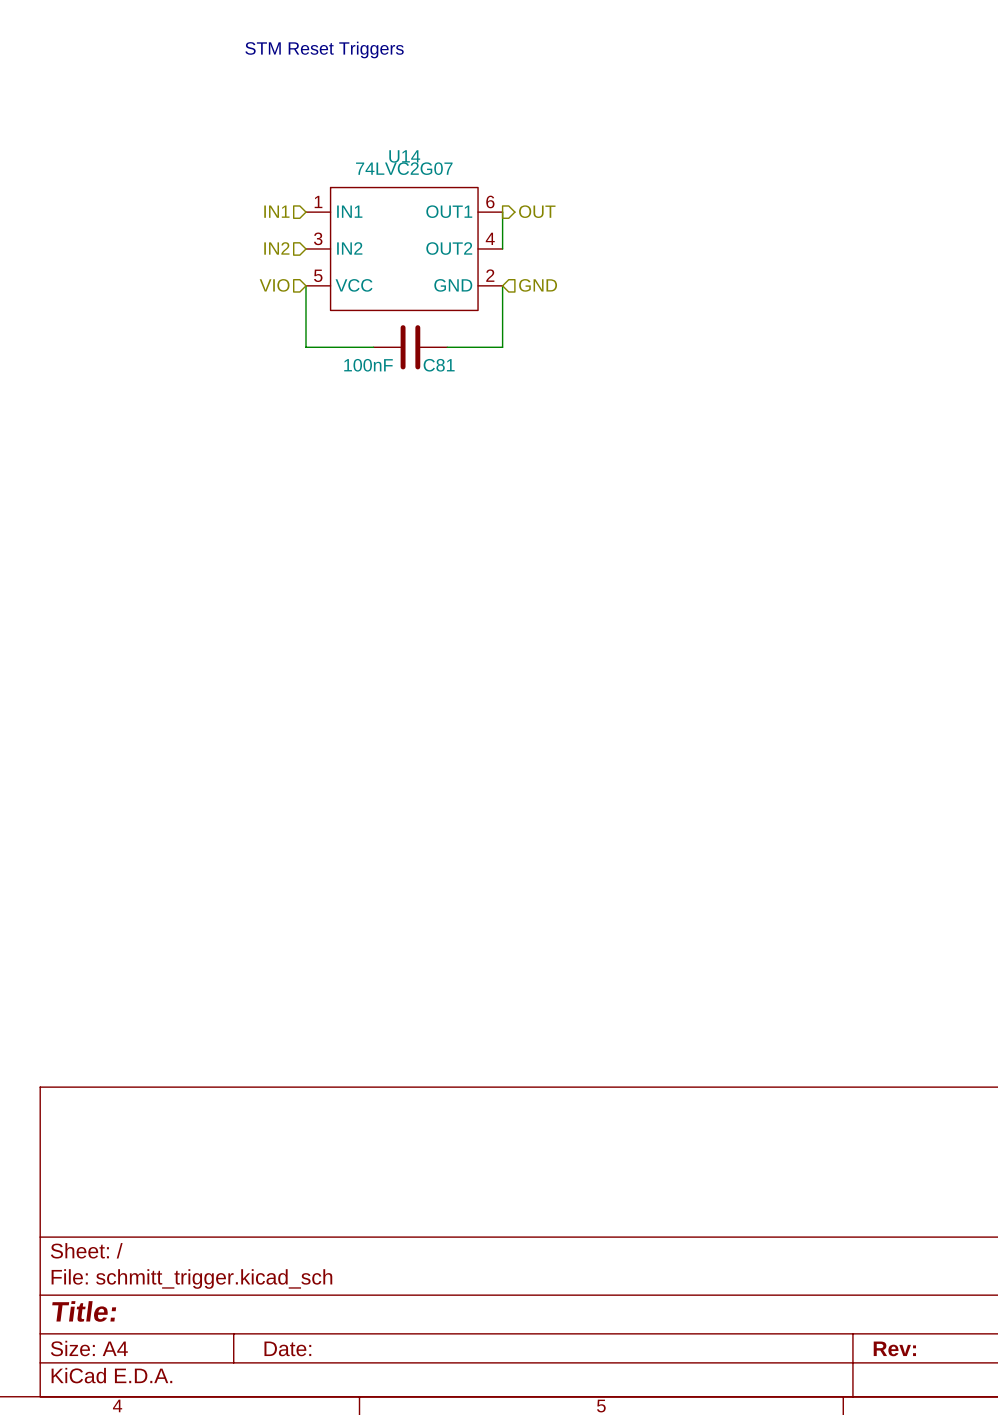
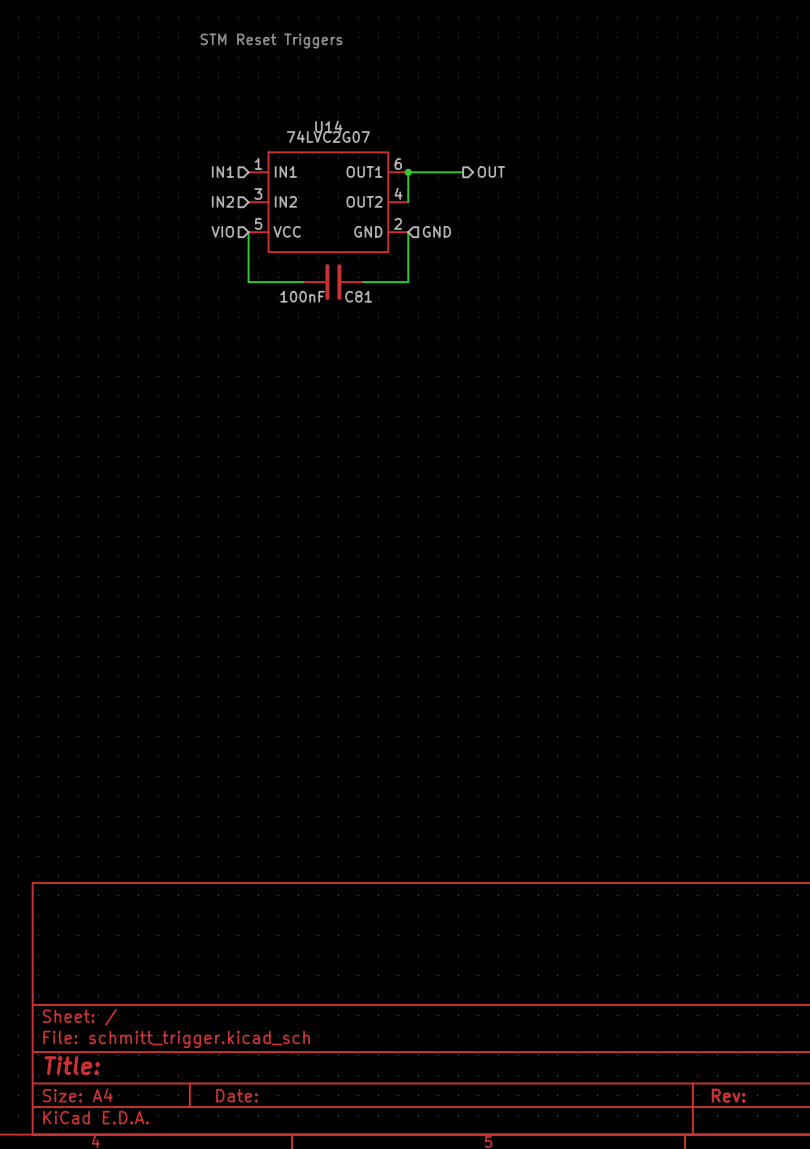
hierarchical label position: OUT (537, 211) -> OUT (491, 171)
wire: none -> (408, 172) (463, 172)
junction: none -> (408, 172)

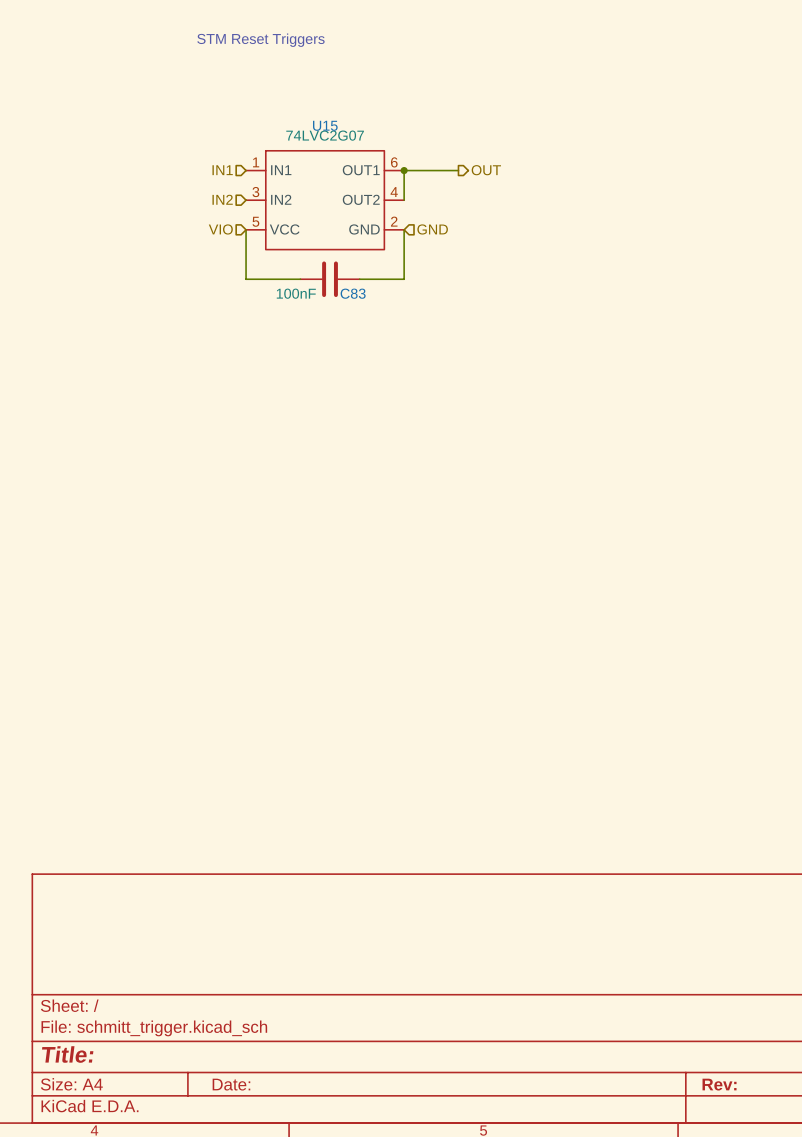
U14 name: U14 (328, 126) -> U15 (325, 125)
C81 name: C81 (358, 296) -> C83 (353, 293)

